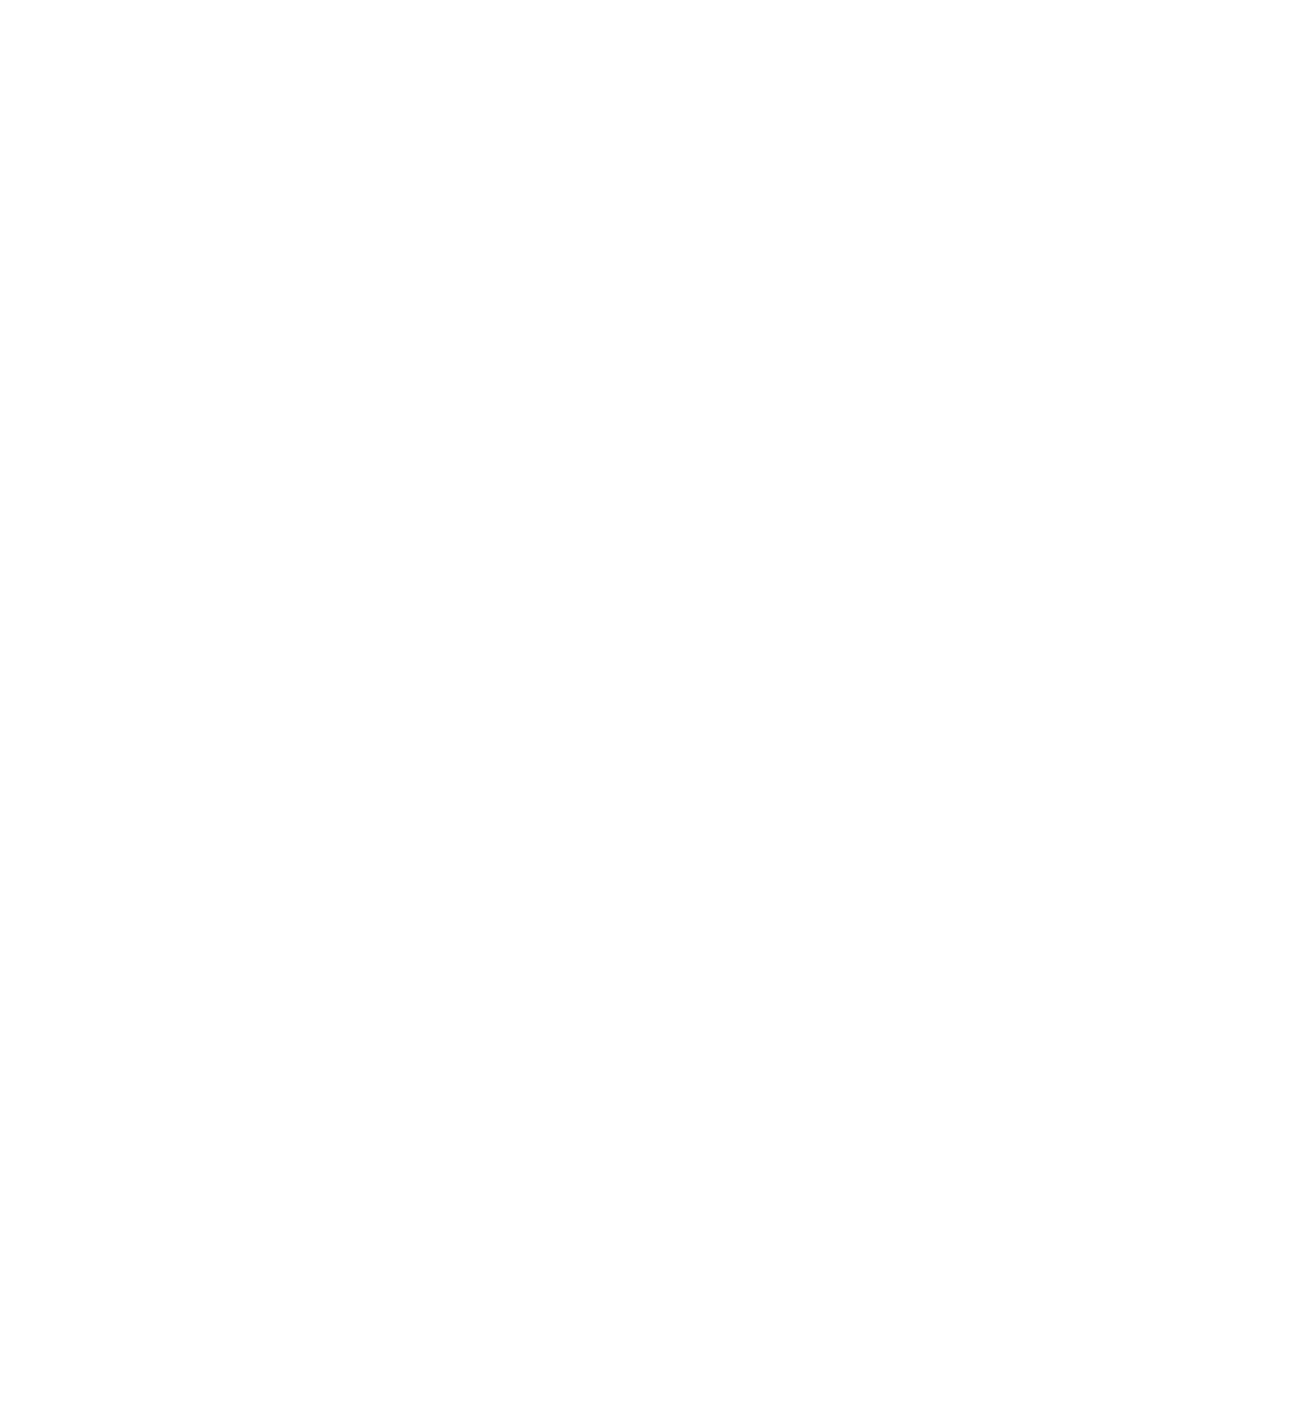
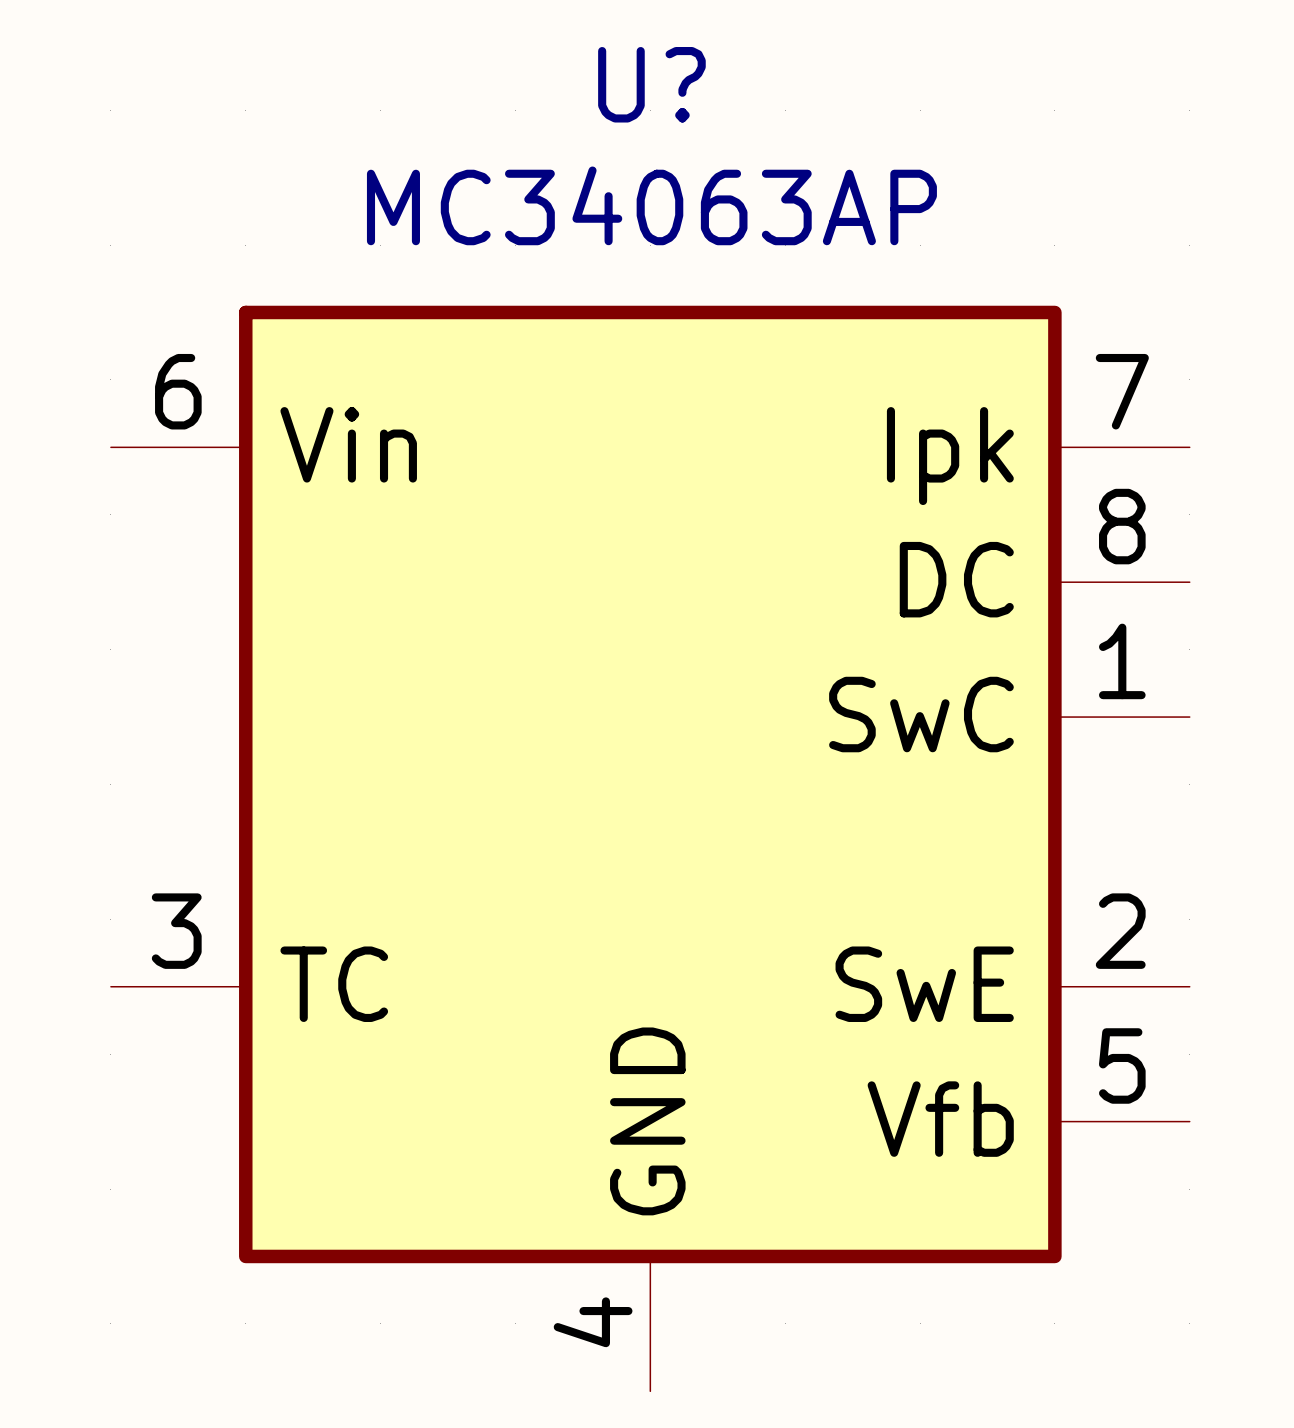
U?: none -> MC34063AP (650, 848)

